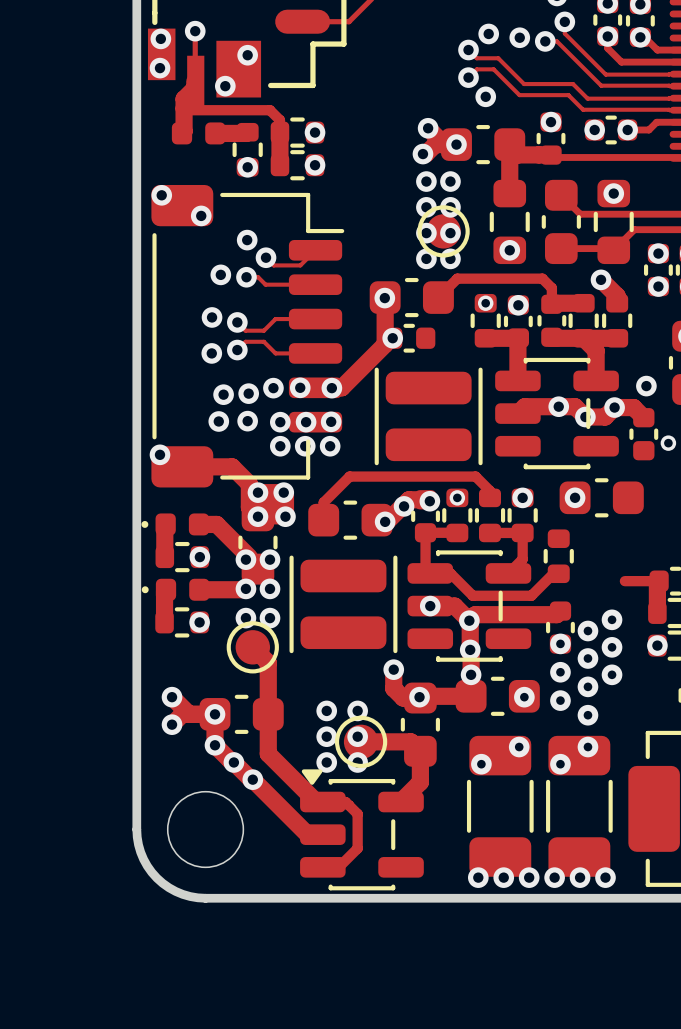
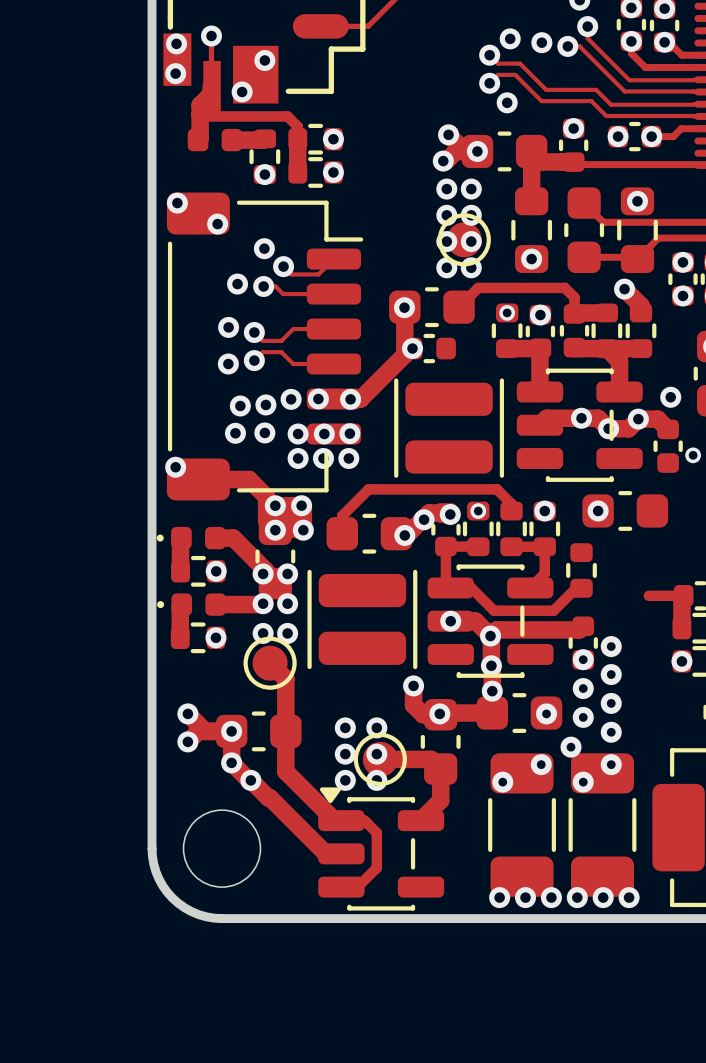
via: (612, 619) -> none
via: (612, 647) -> none
via: (612, 674) -> none
via: none -> (571, 747)
via: (252, 779) -> none

